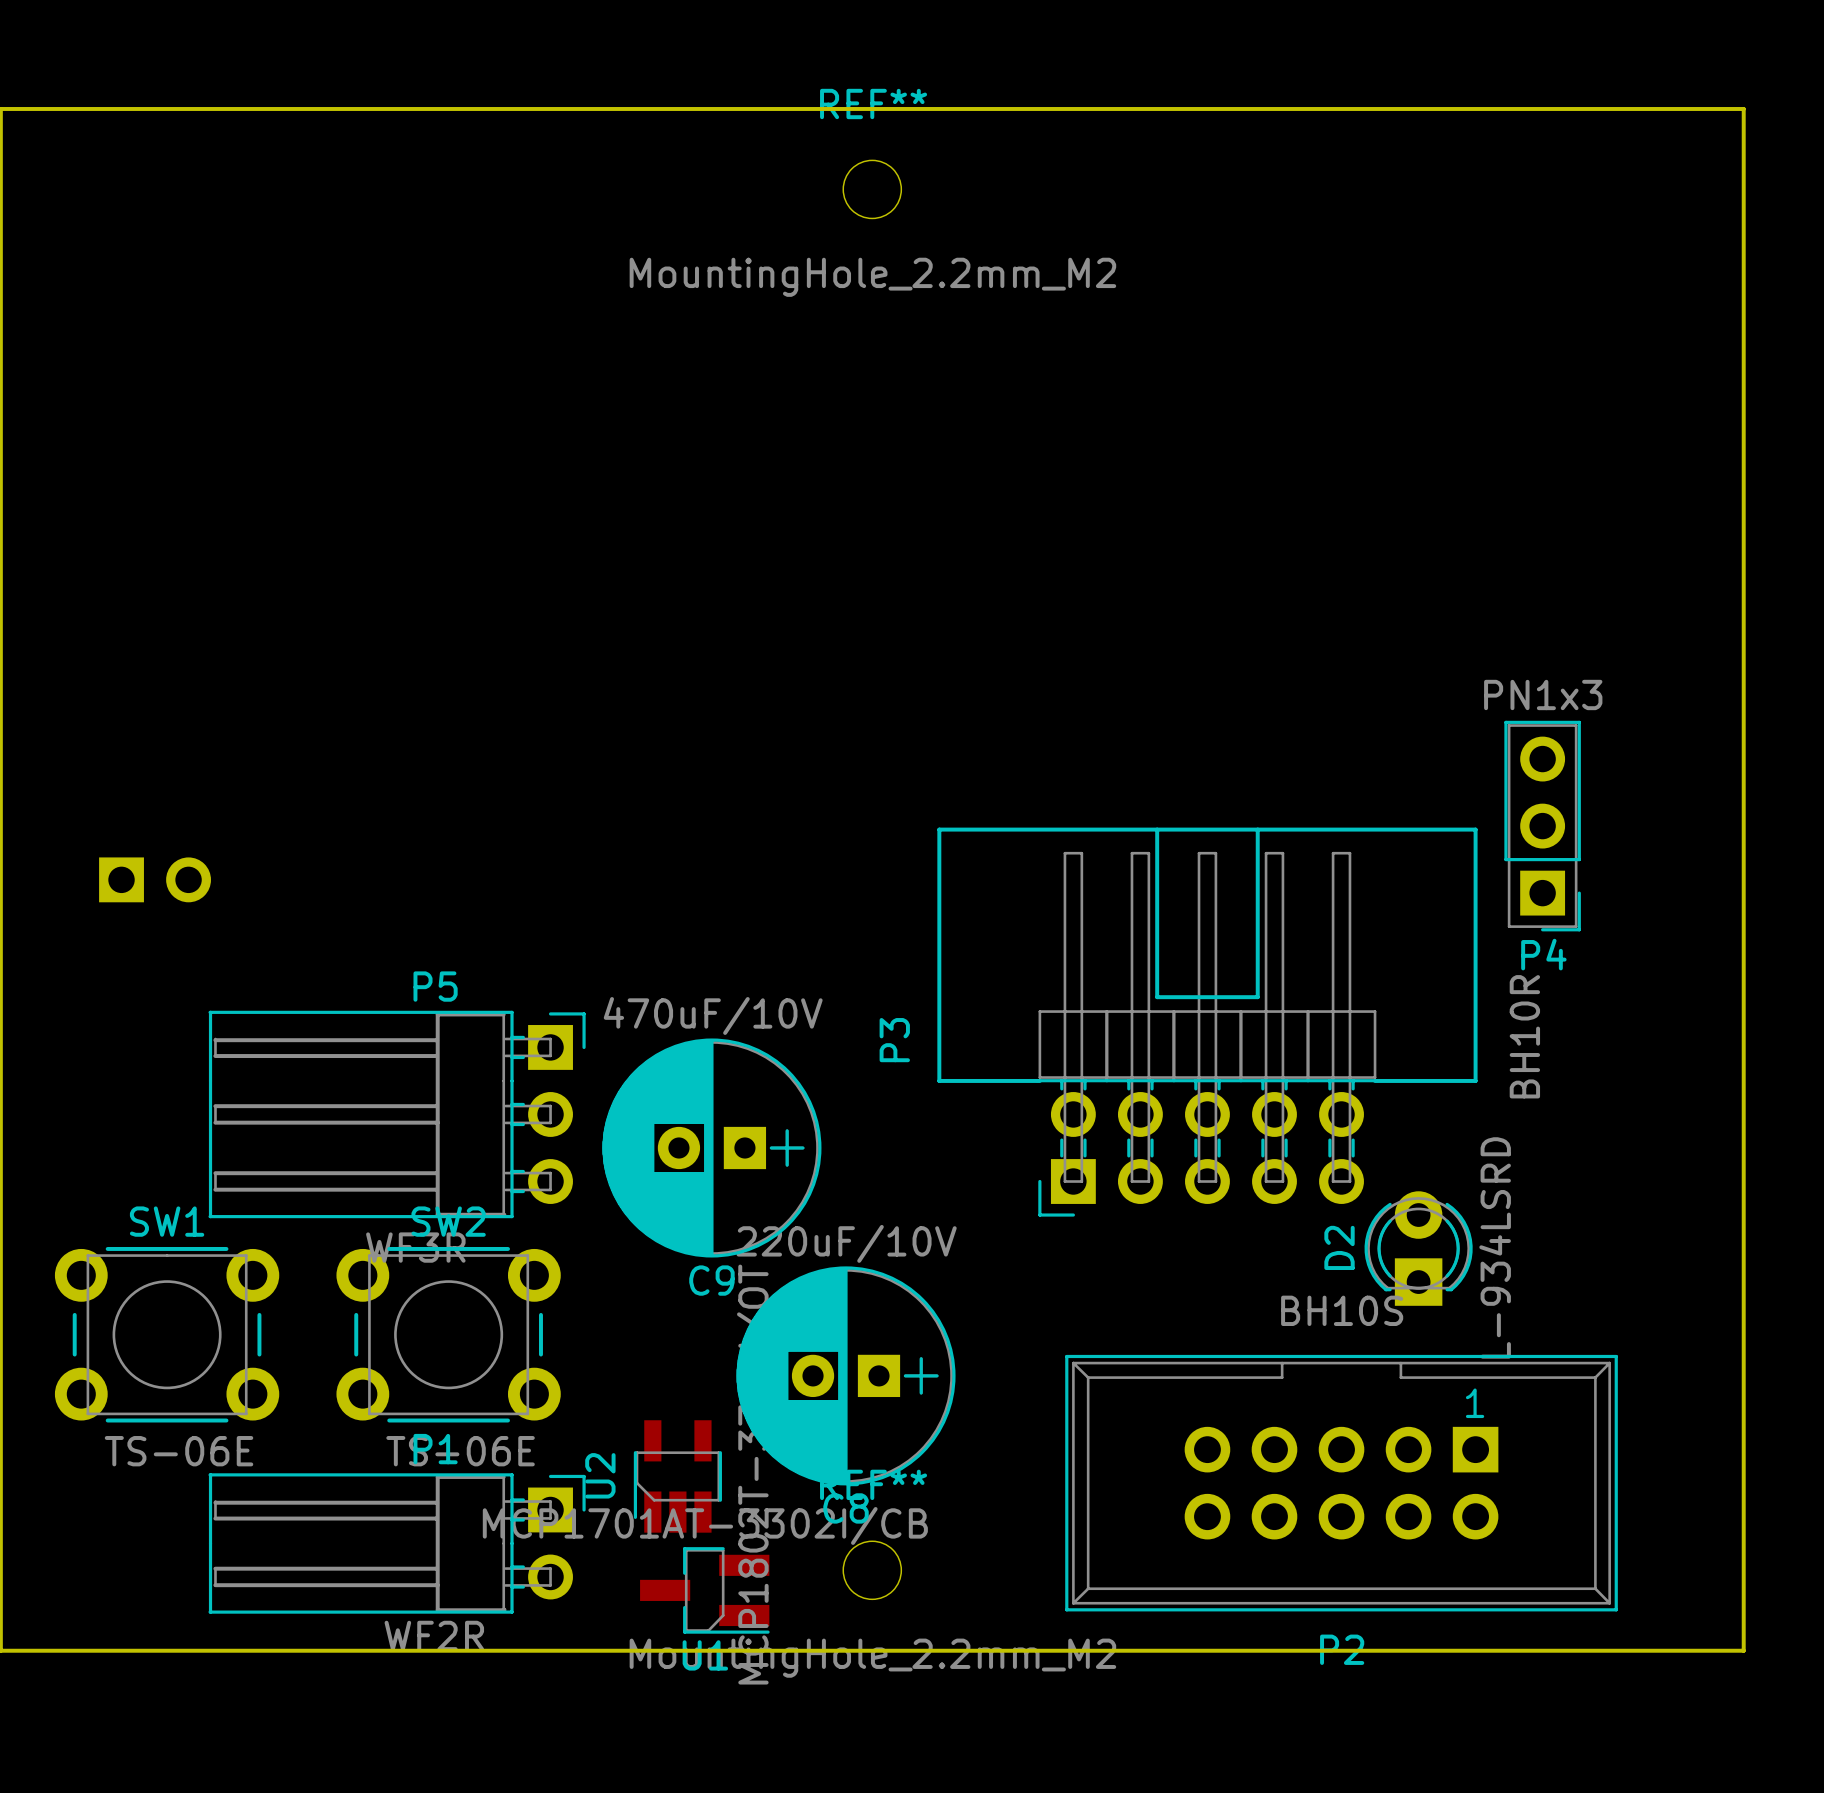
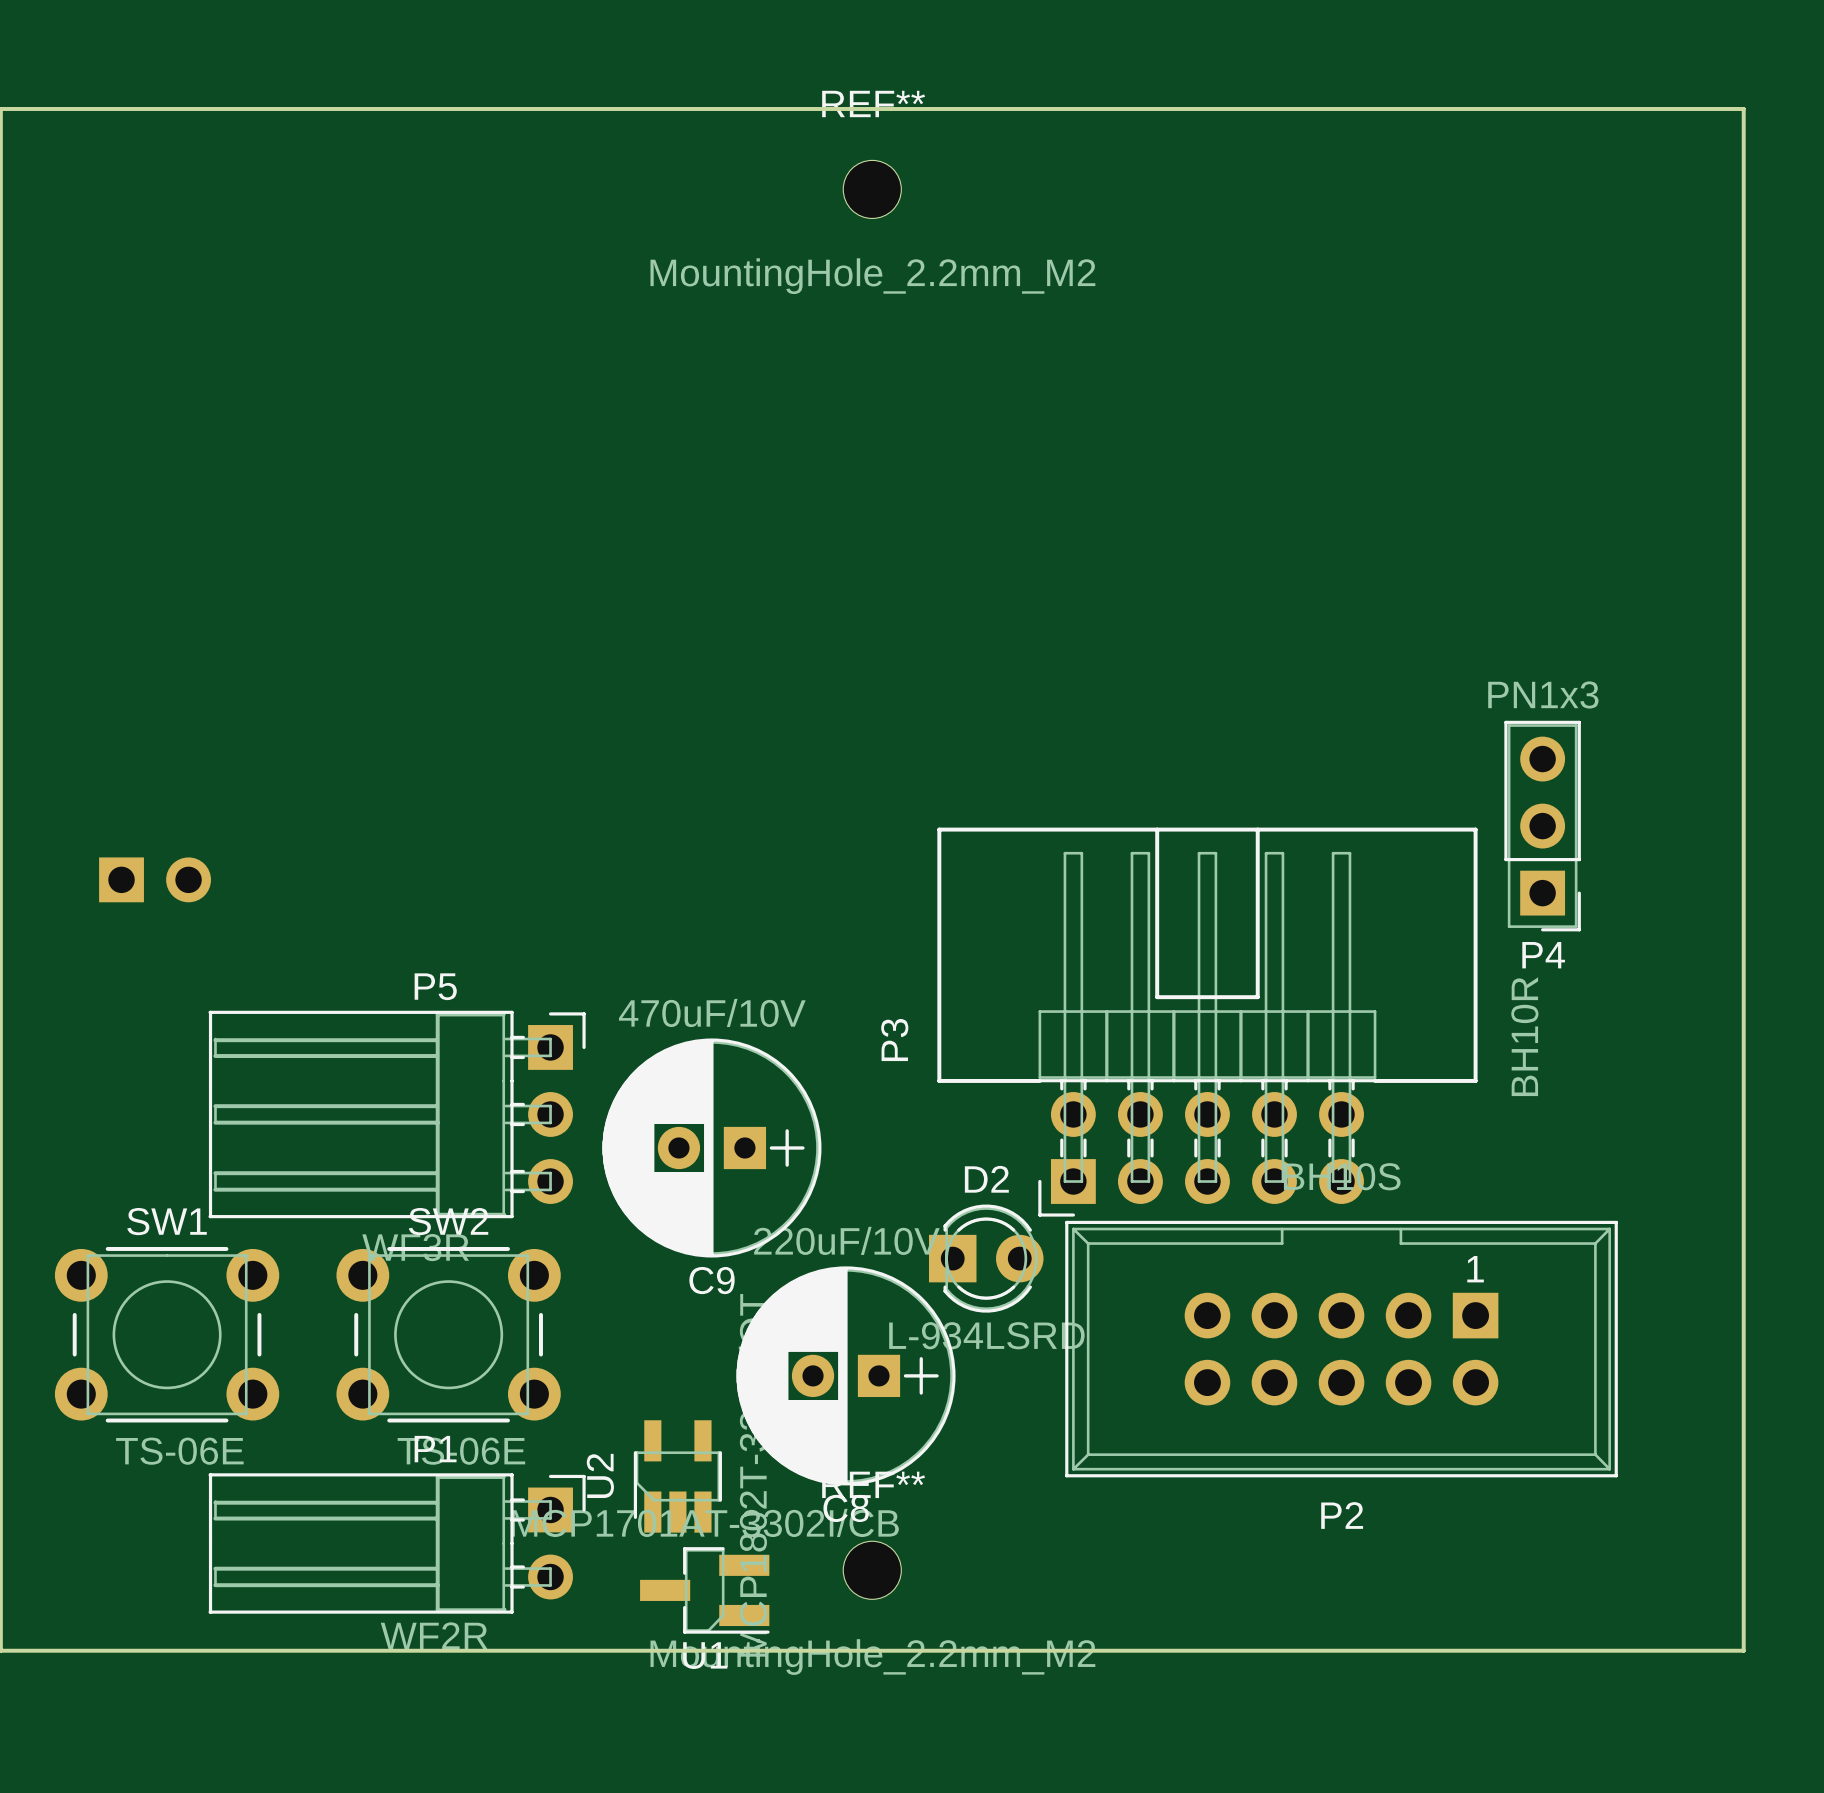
D2 rotation: 0° (1418, 1248) -> 90° clockwise (986, 1258)
D2 position: (1418, 1248) -> (986, 1258)
P2 position: (1341, 1483) -> (1341, 1349)

